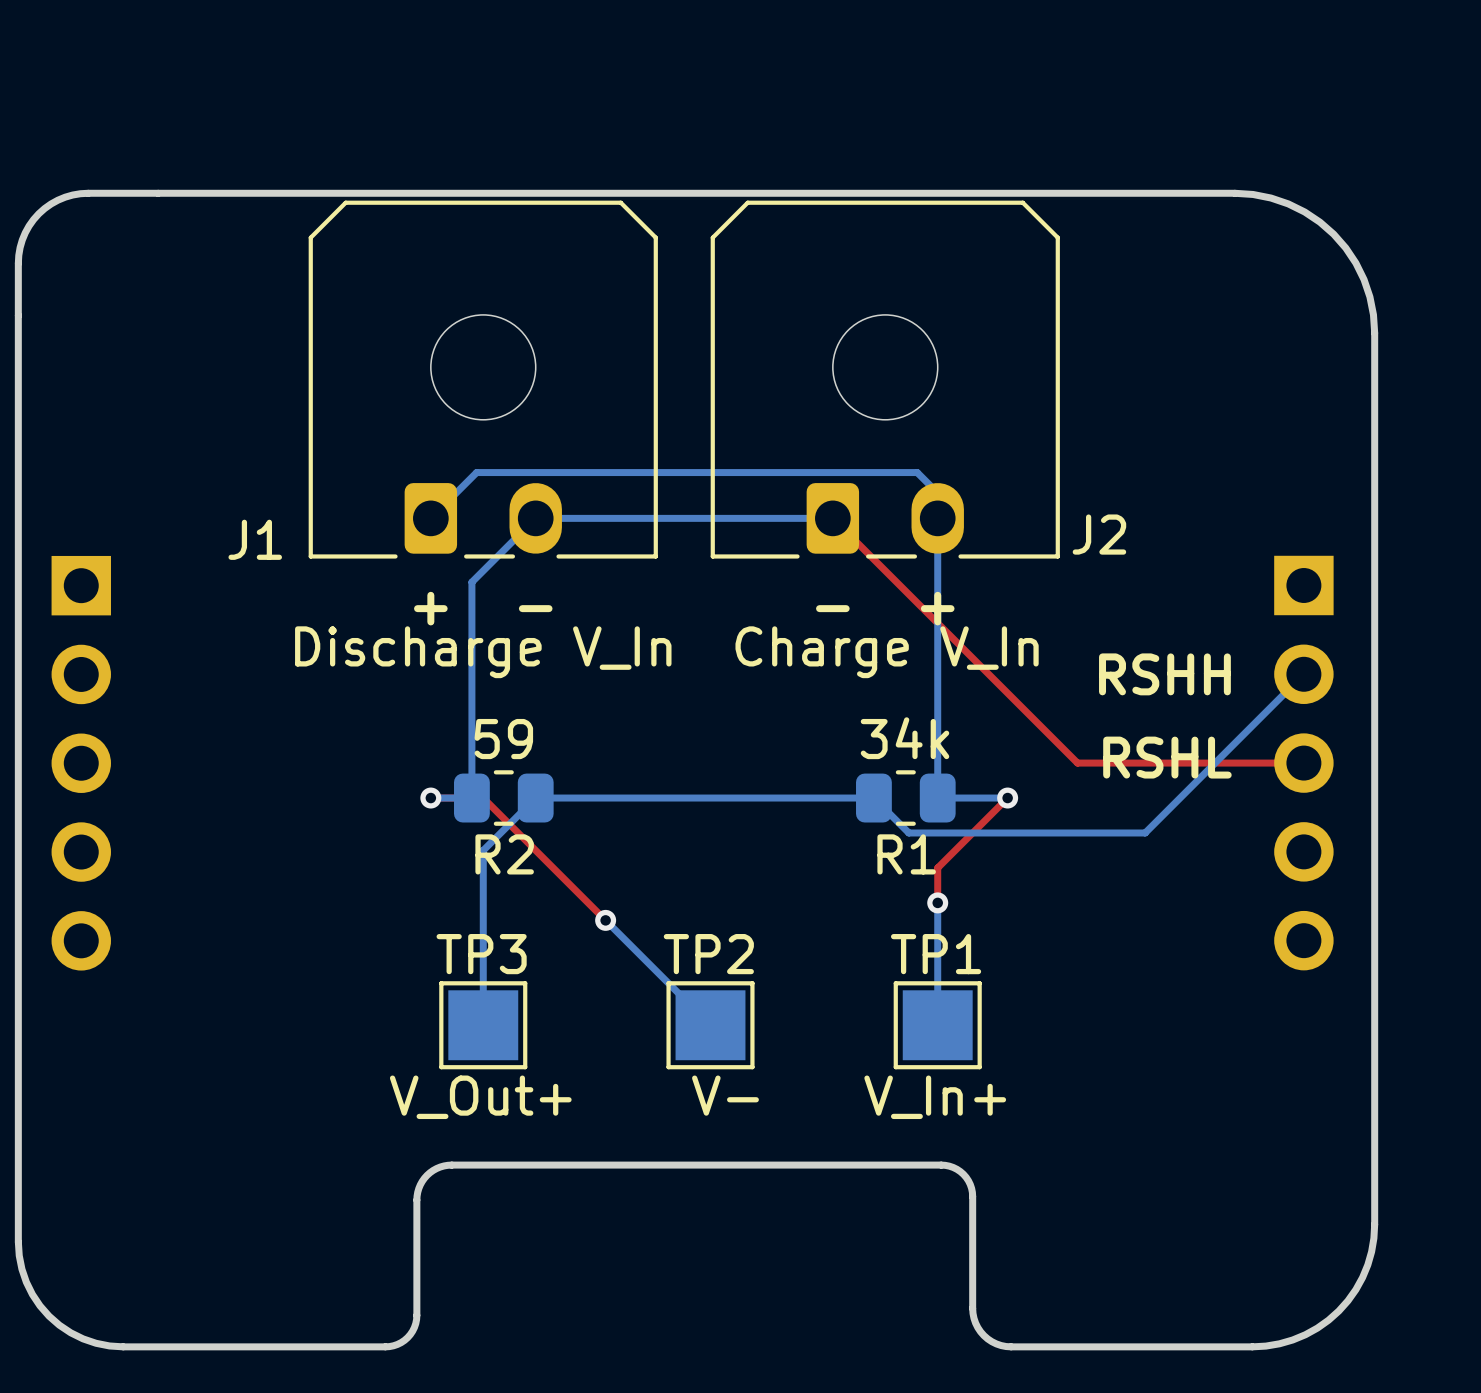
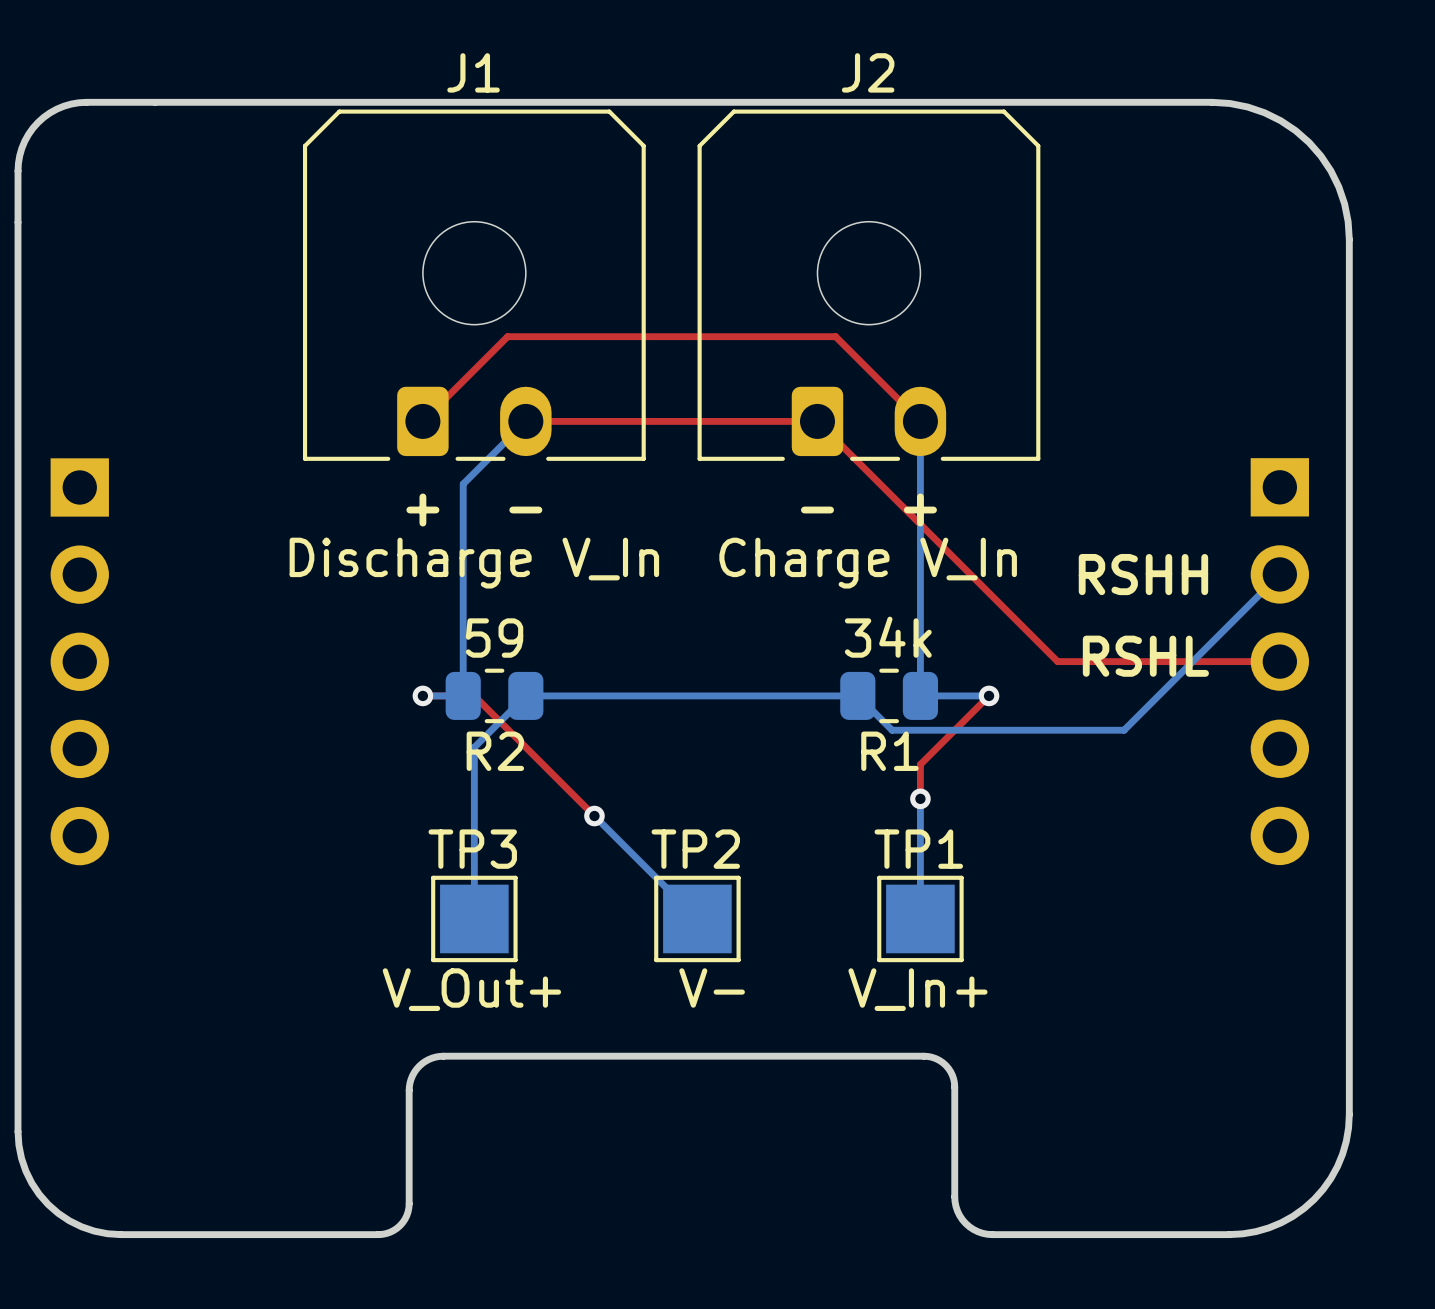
top track: none -> (817, 421) (525, 421)
bottom track: (832, 518) (535, 518) -> none
top track: none -> (920, 421) (835, 336) (507, 336) (422, 421)
bottom track: (937, 518) (938, 493) (917, 472) (476, 472) (430, 518) -> none
J2 name position: J2 (1099, 534) -> J2 (868, 72)
J1 name position: J1 (255, 539) -> J1 (473, 72)
text: Discharge V_In (483, 652) -> none
text: Charge V_In (887, 652) -> none
J1 value: none -> Discharge V_In (474, 563)
J2 value: none -> Charge V_In (868, 563)

